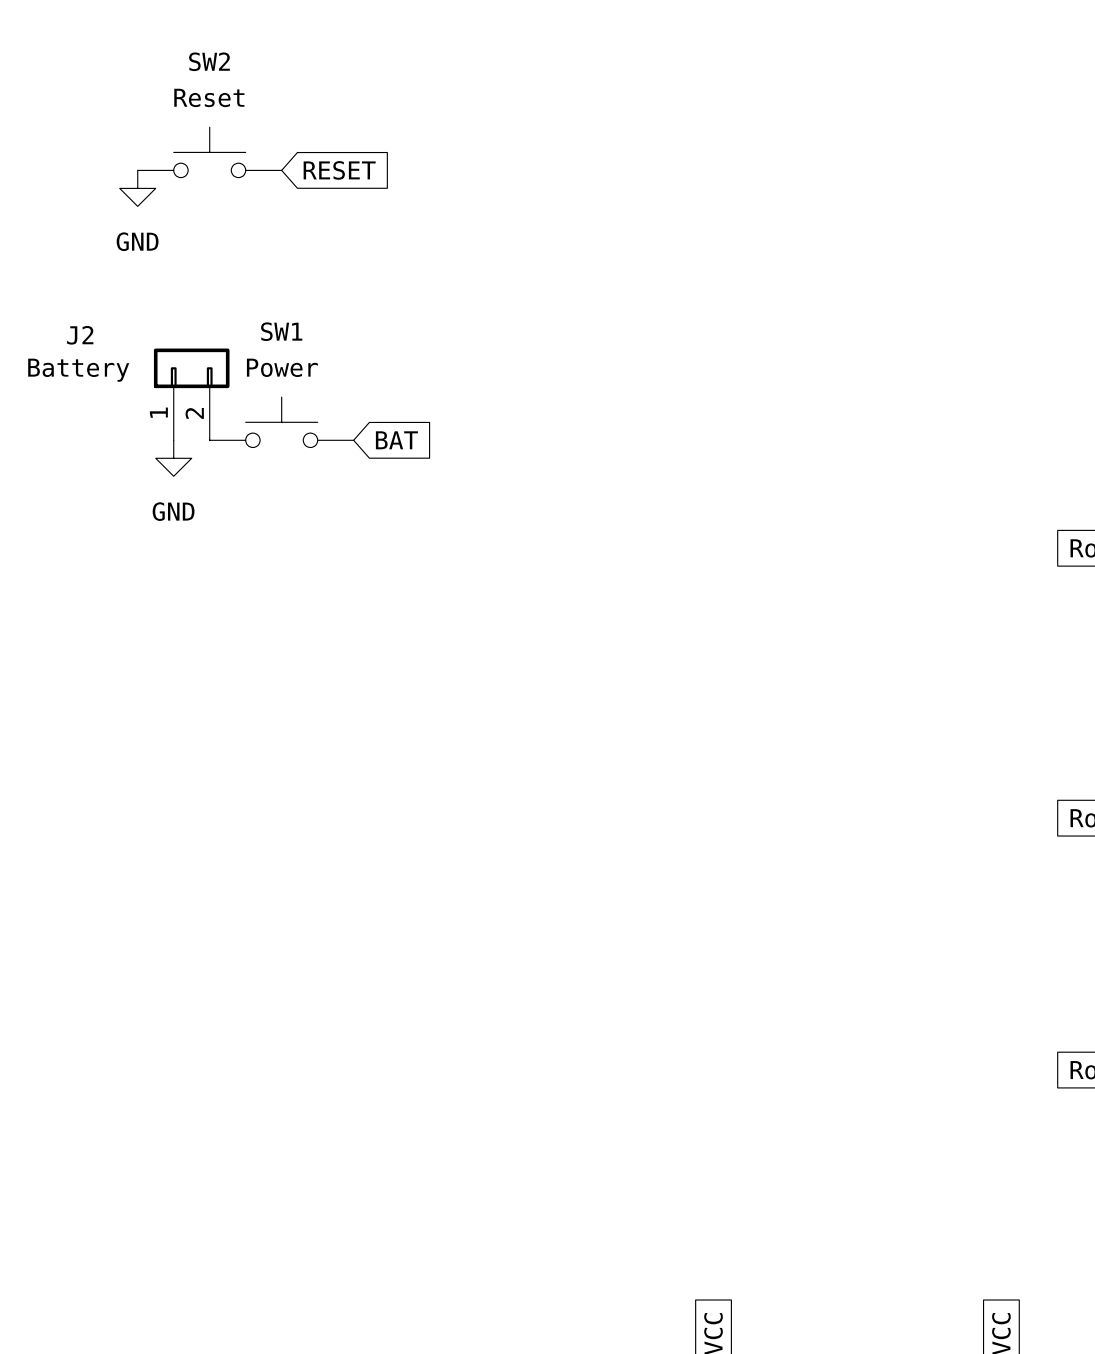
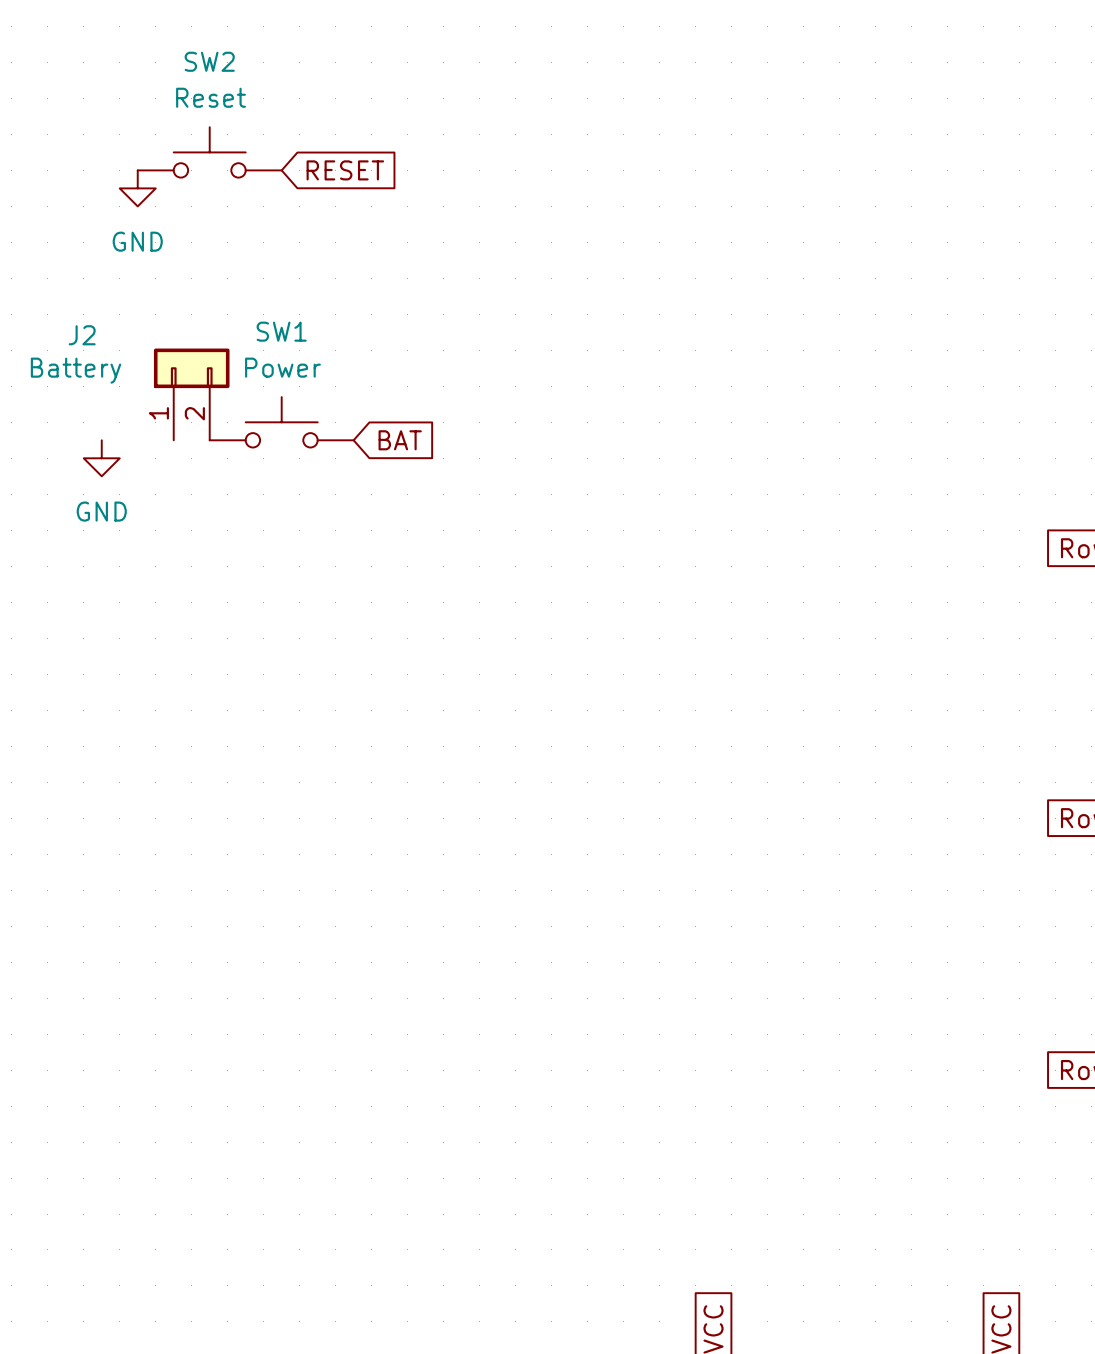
power symbol position: GND (173, 458) -> GND (101, 458)

